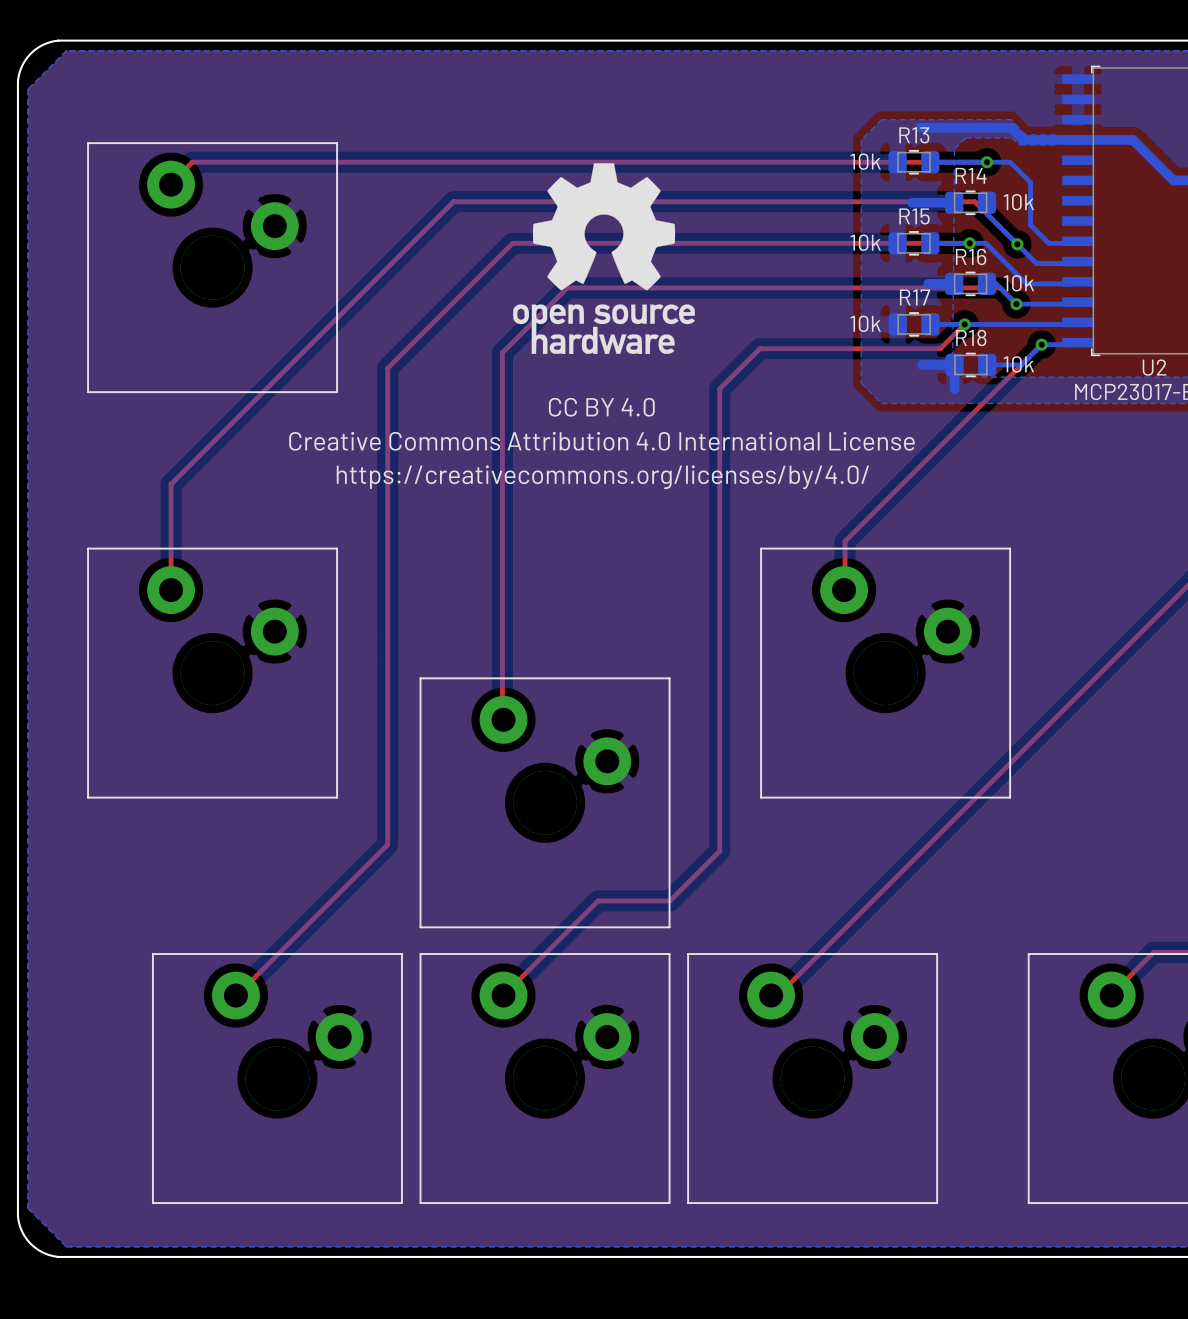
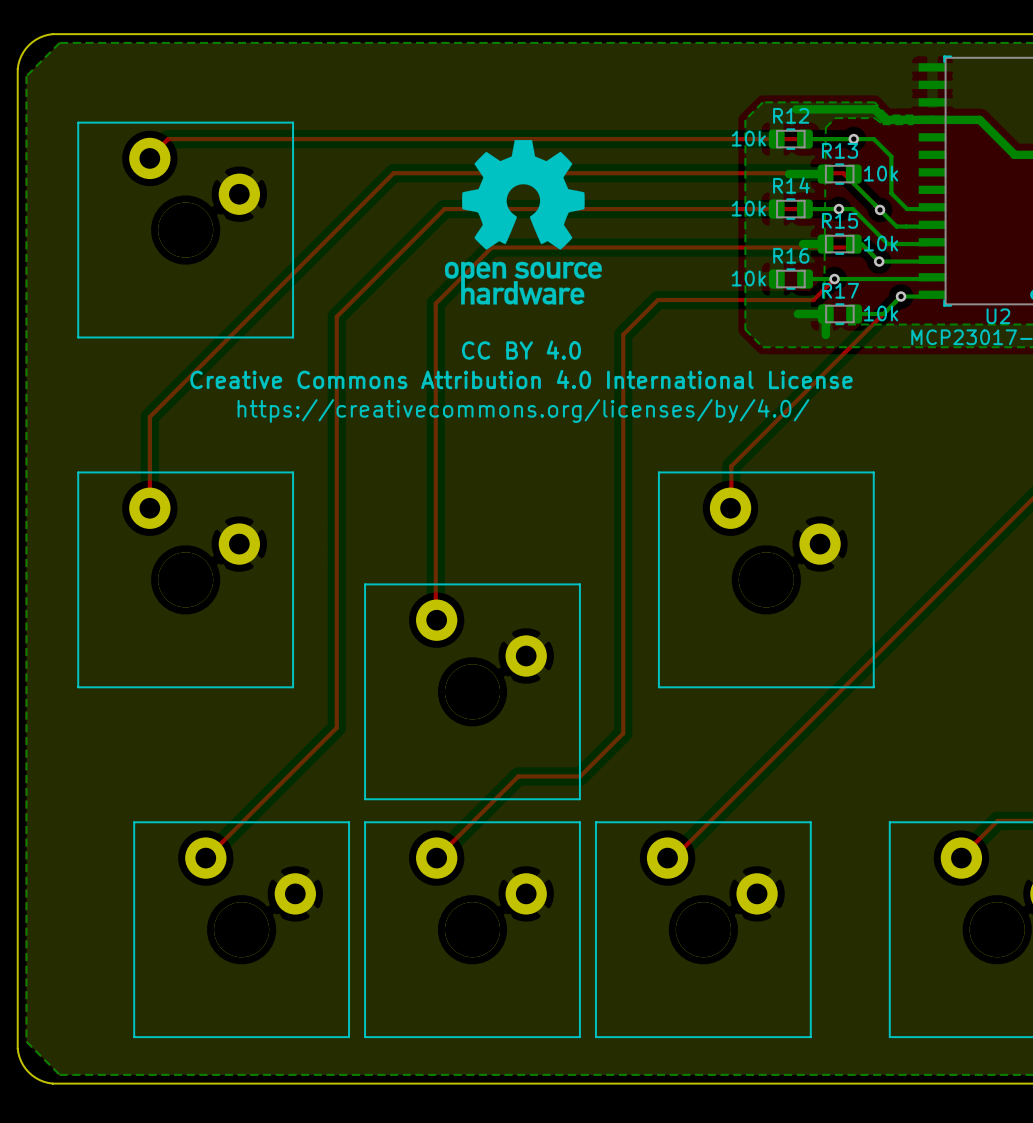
R13 name: R13 (914, 135) -> R12 (791, 115)
R14 name: R14 (970, 175) -> R13 (840, 150)
R15 name: R15 (914, 216) -> R14 (791, 185)
R16 name: R16 (971, 256) -> R15 (840, 220)
R17 name: R17 (914, 297) -> R16 (791, 255)
R18 name: R18 (971, 337) -> R17 (840, 290)

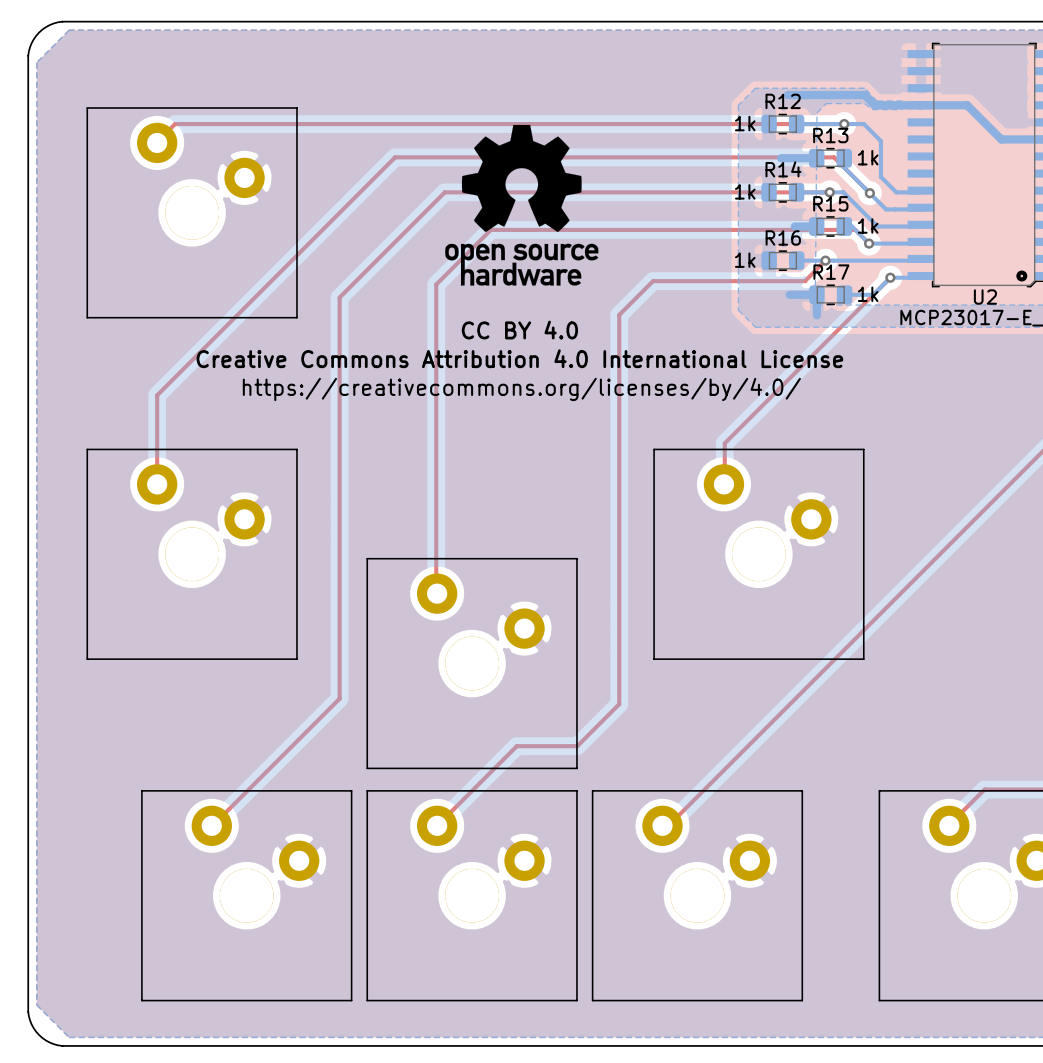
R12 value: 10k (748, 138) -> 1k (745, 123)
R13 value: 10k (881, 173) -> 1k (868, 157)
R14 value: 10k (748, 208) -> 1k (745, 191)
R15 value: 10k (881, 243) -> 1k (868, 226)
R16 value: 10k (748, 278) -> 1k (745, 260)
R17 value: 10k (881, 313) -> 1k (868, 294)

